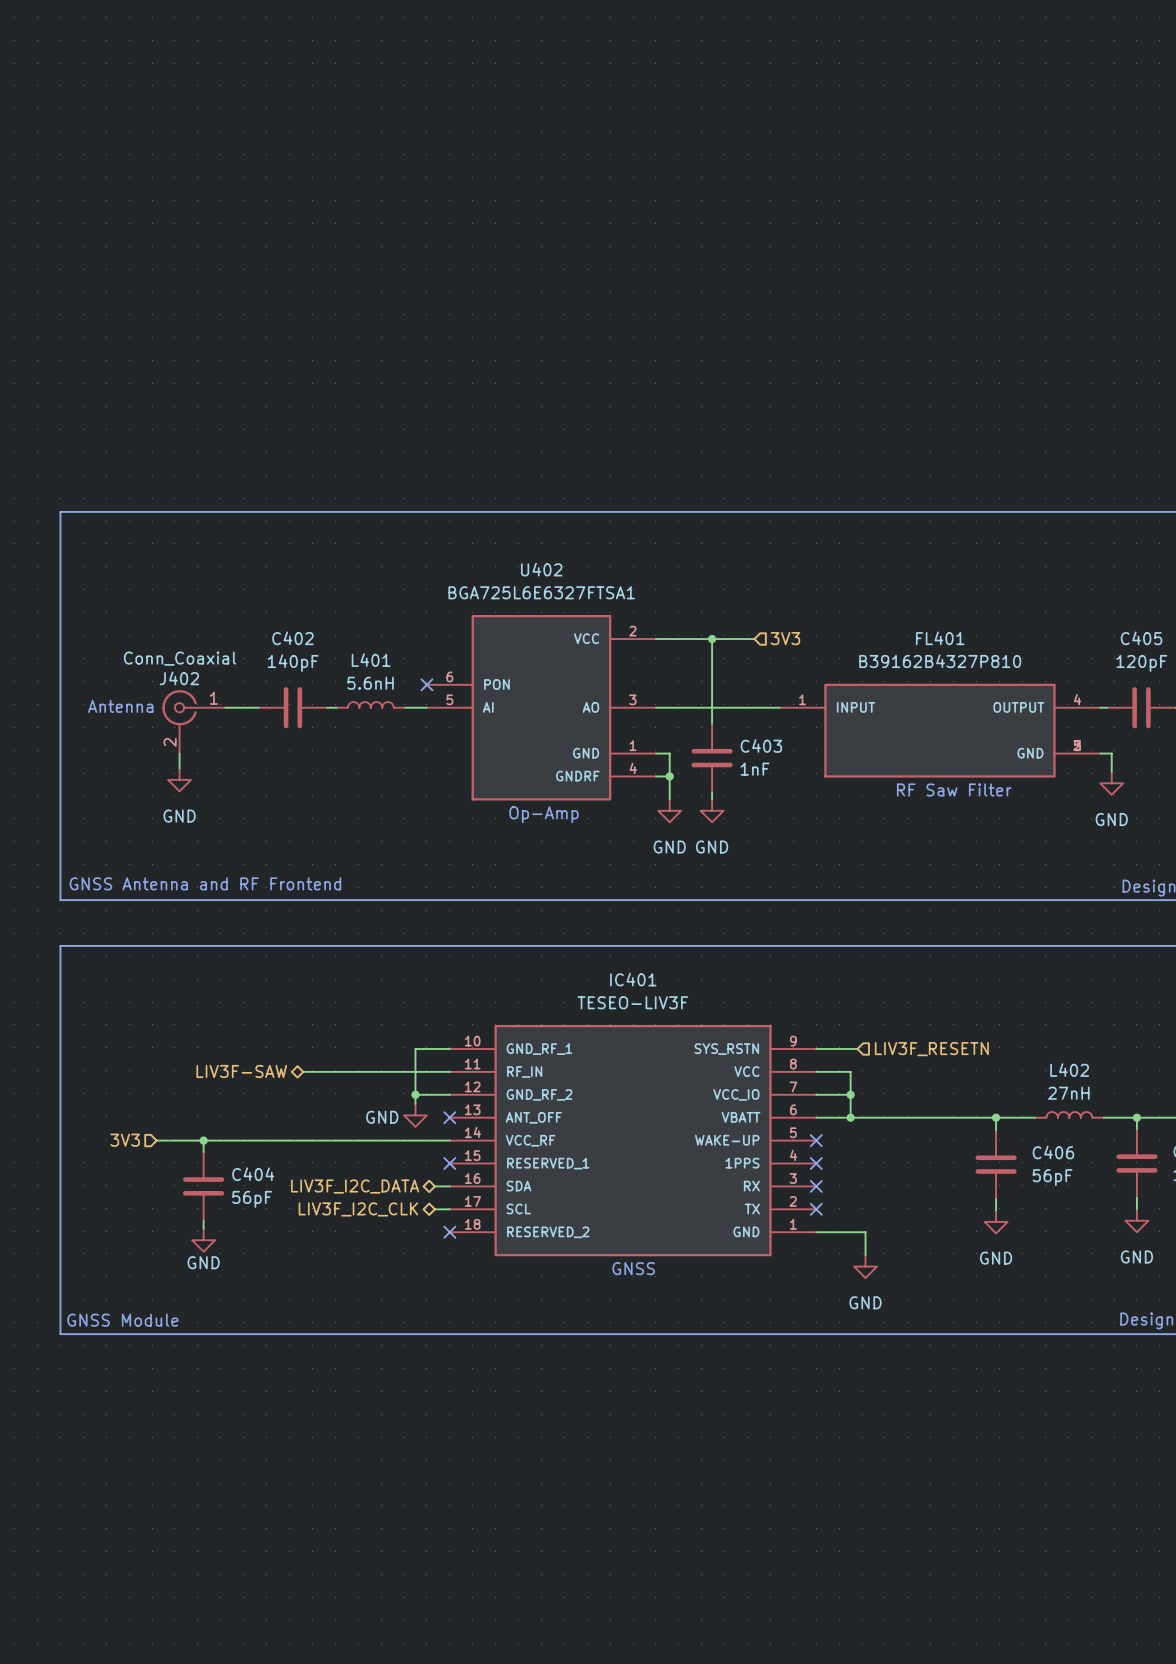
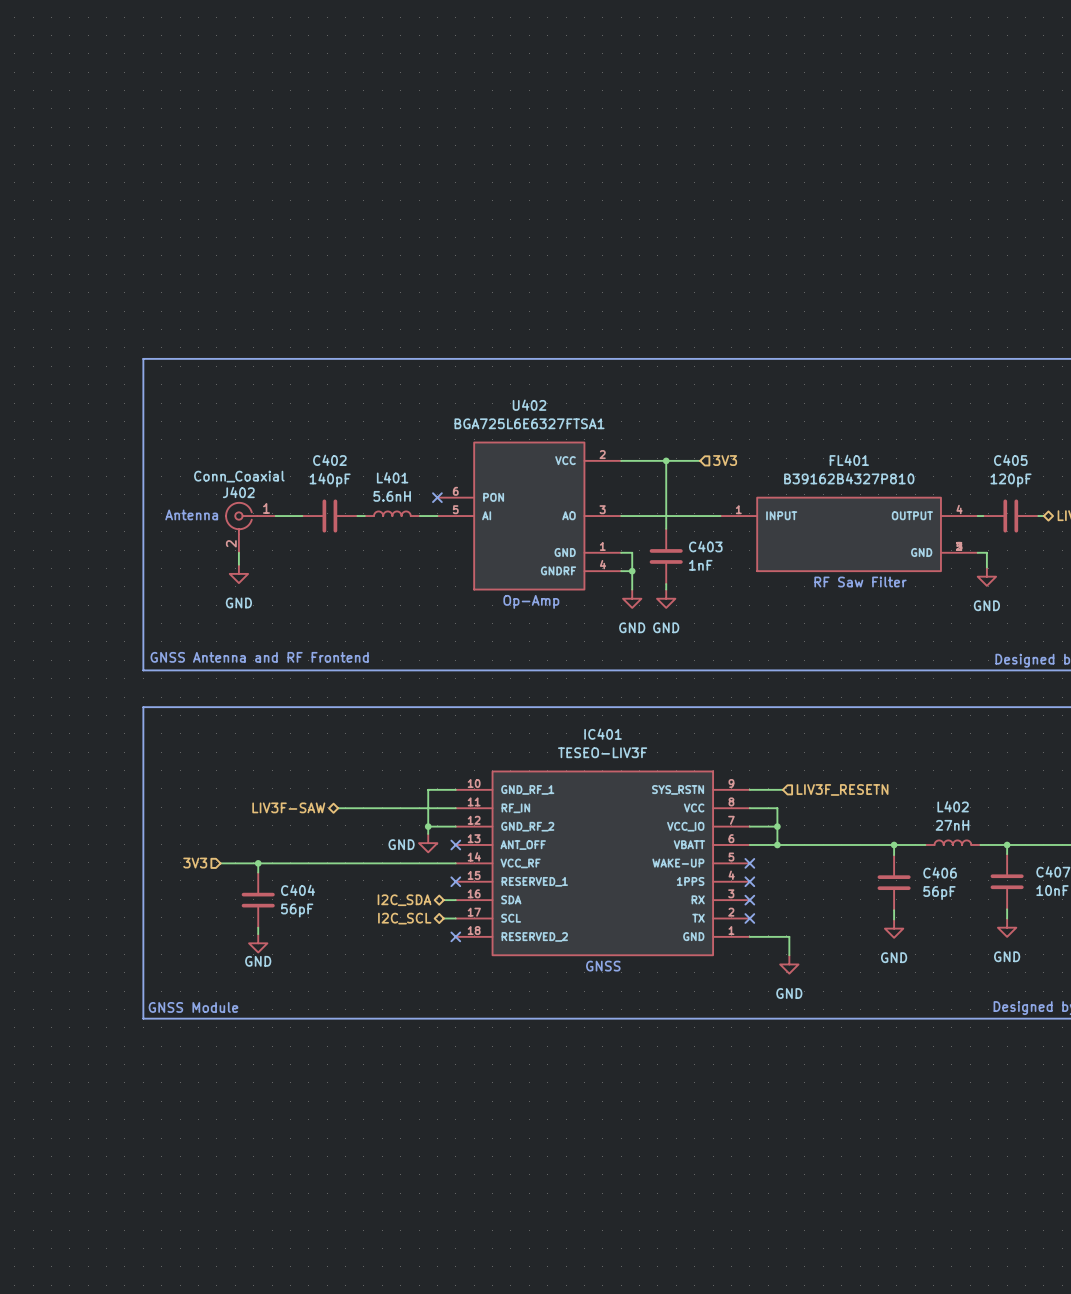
hierarchical label: LIV3F_I2C_DATA (355, 1186) -> I2C_SDA (404, 900)
hierarchical label: LIV3F_I2C_CLK (358, 1209) -> I2C_SCL (404, 918)

